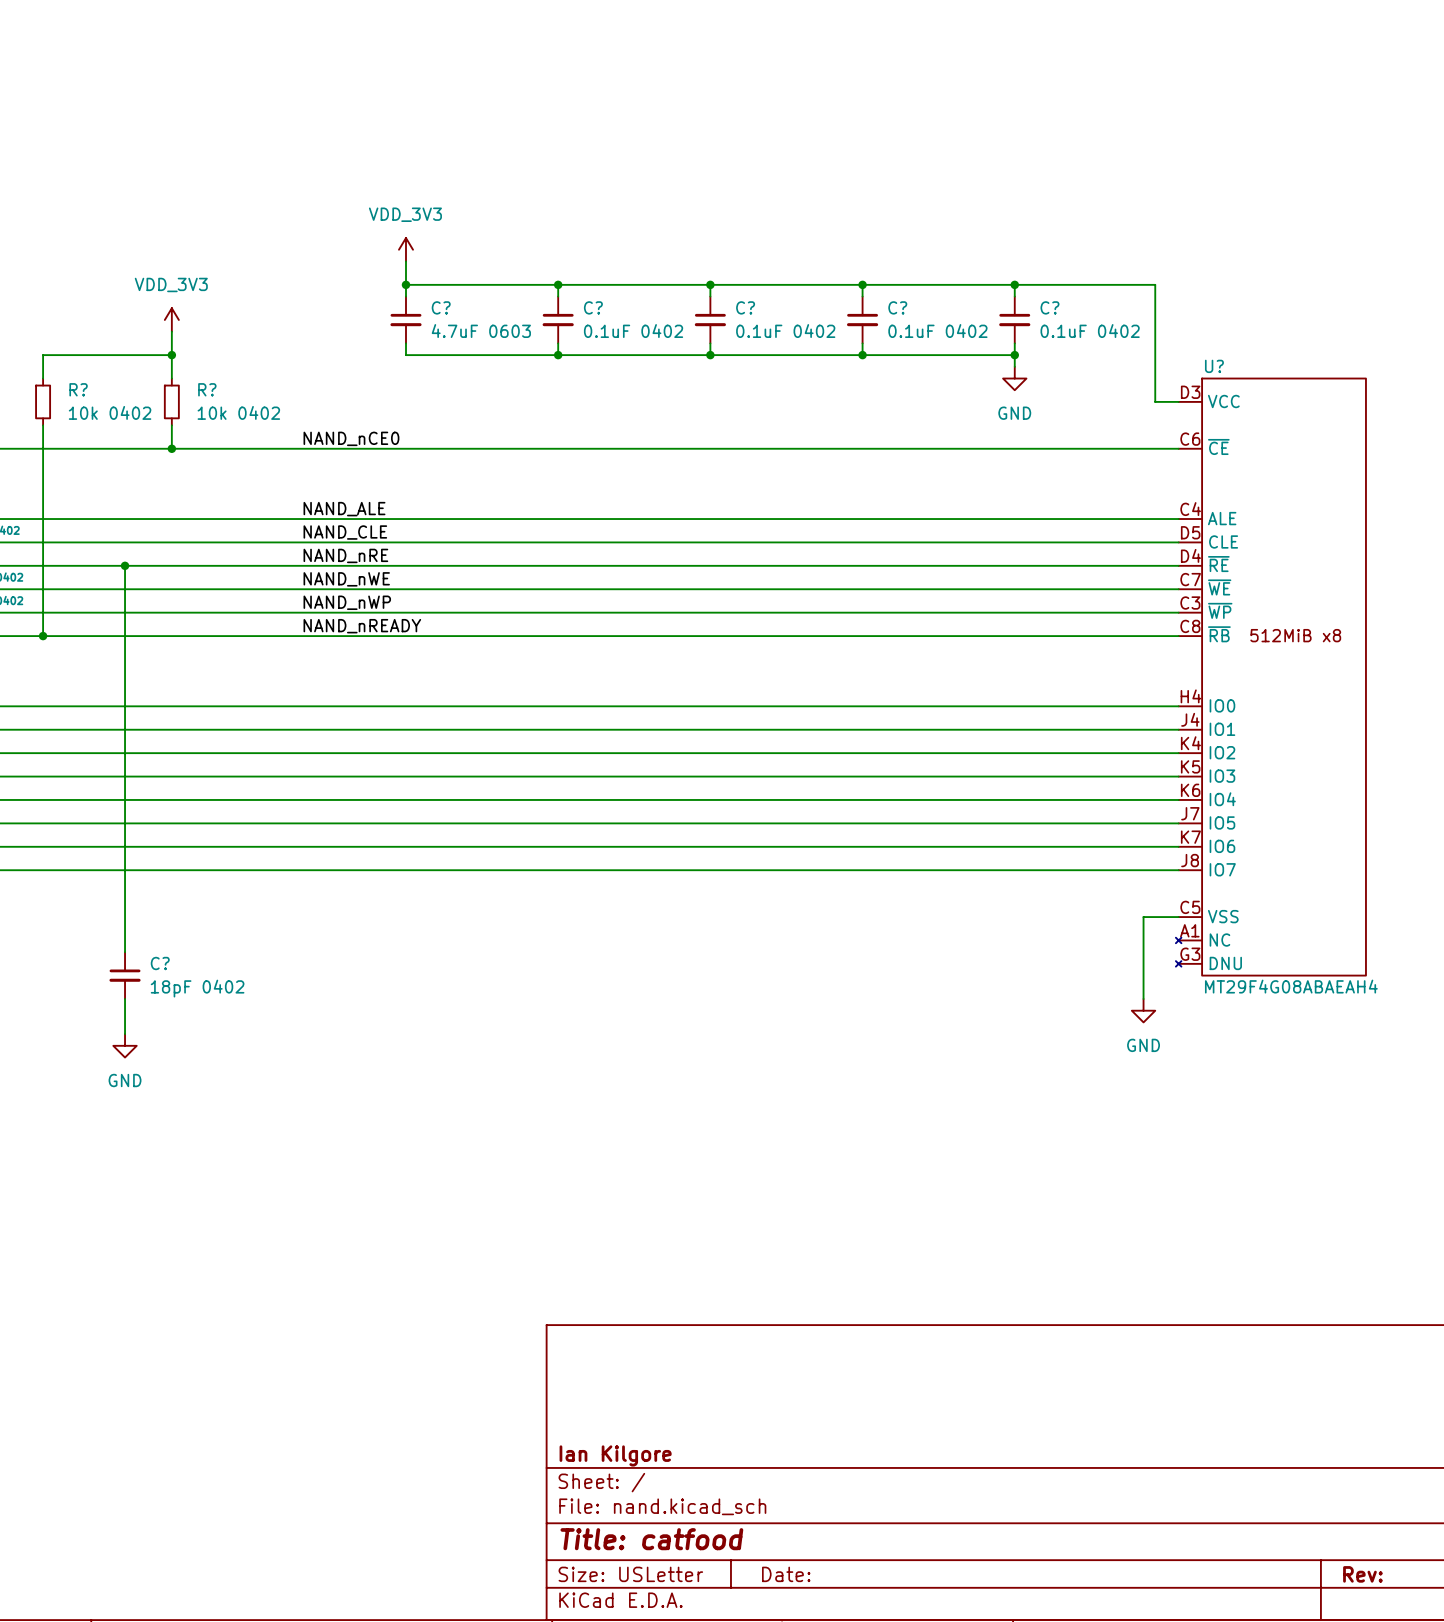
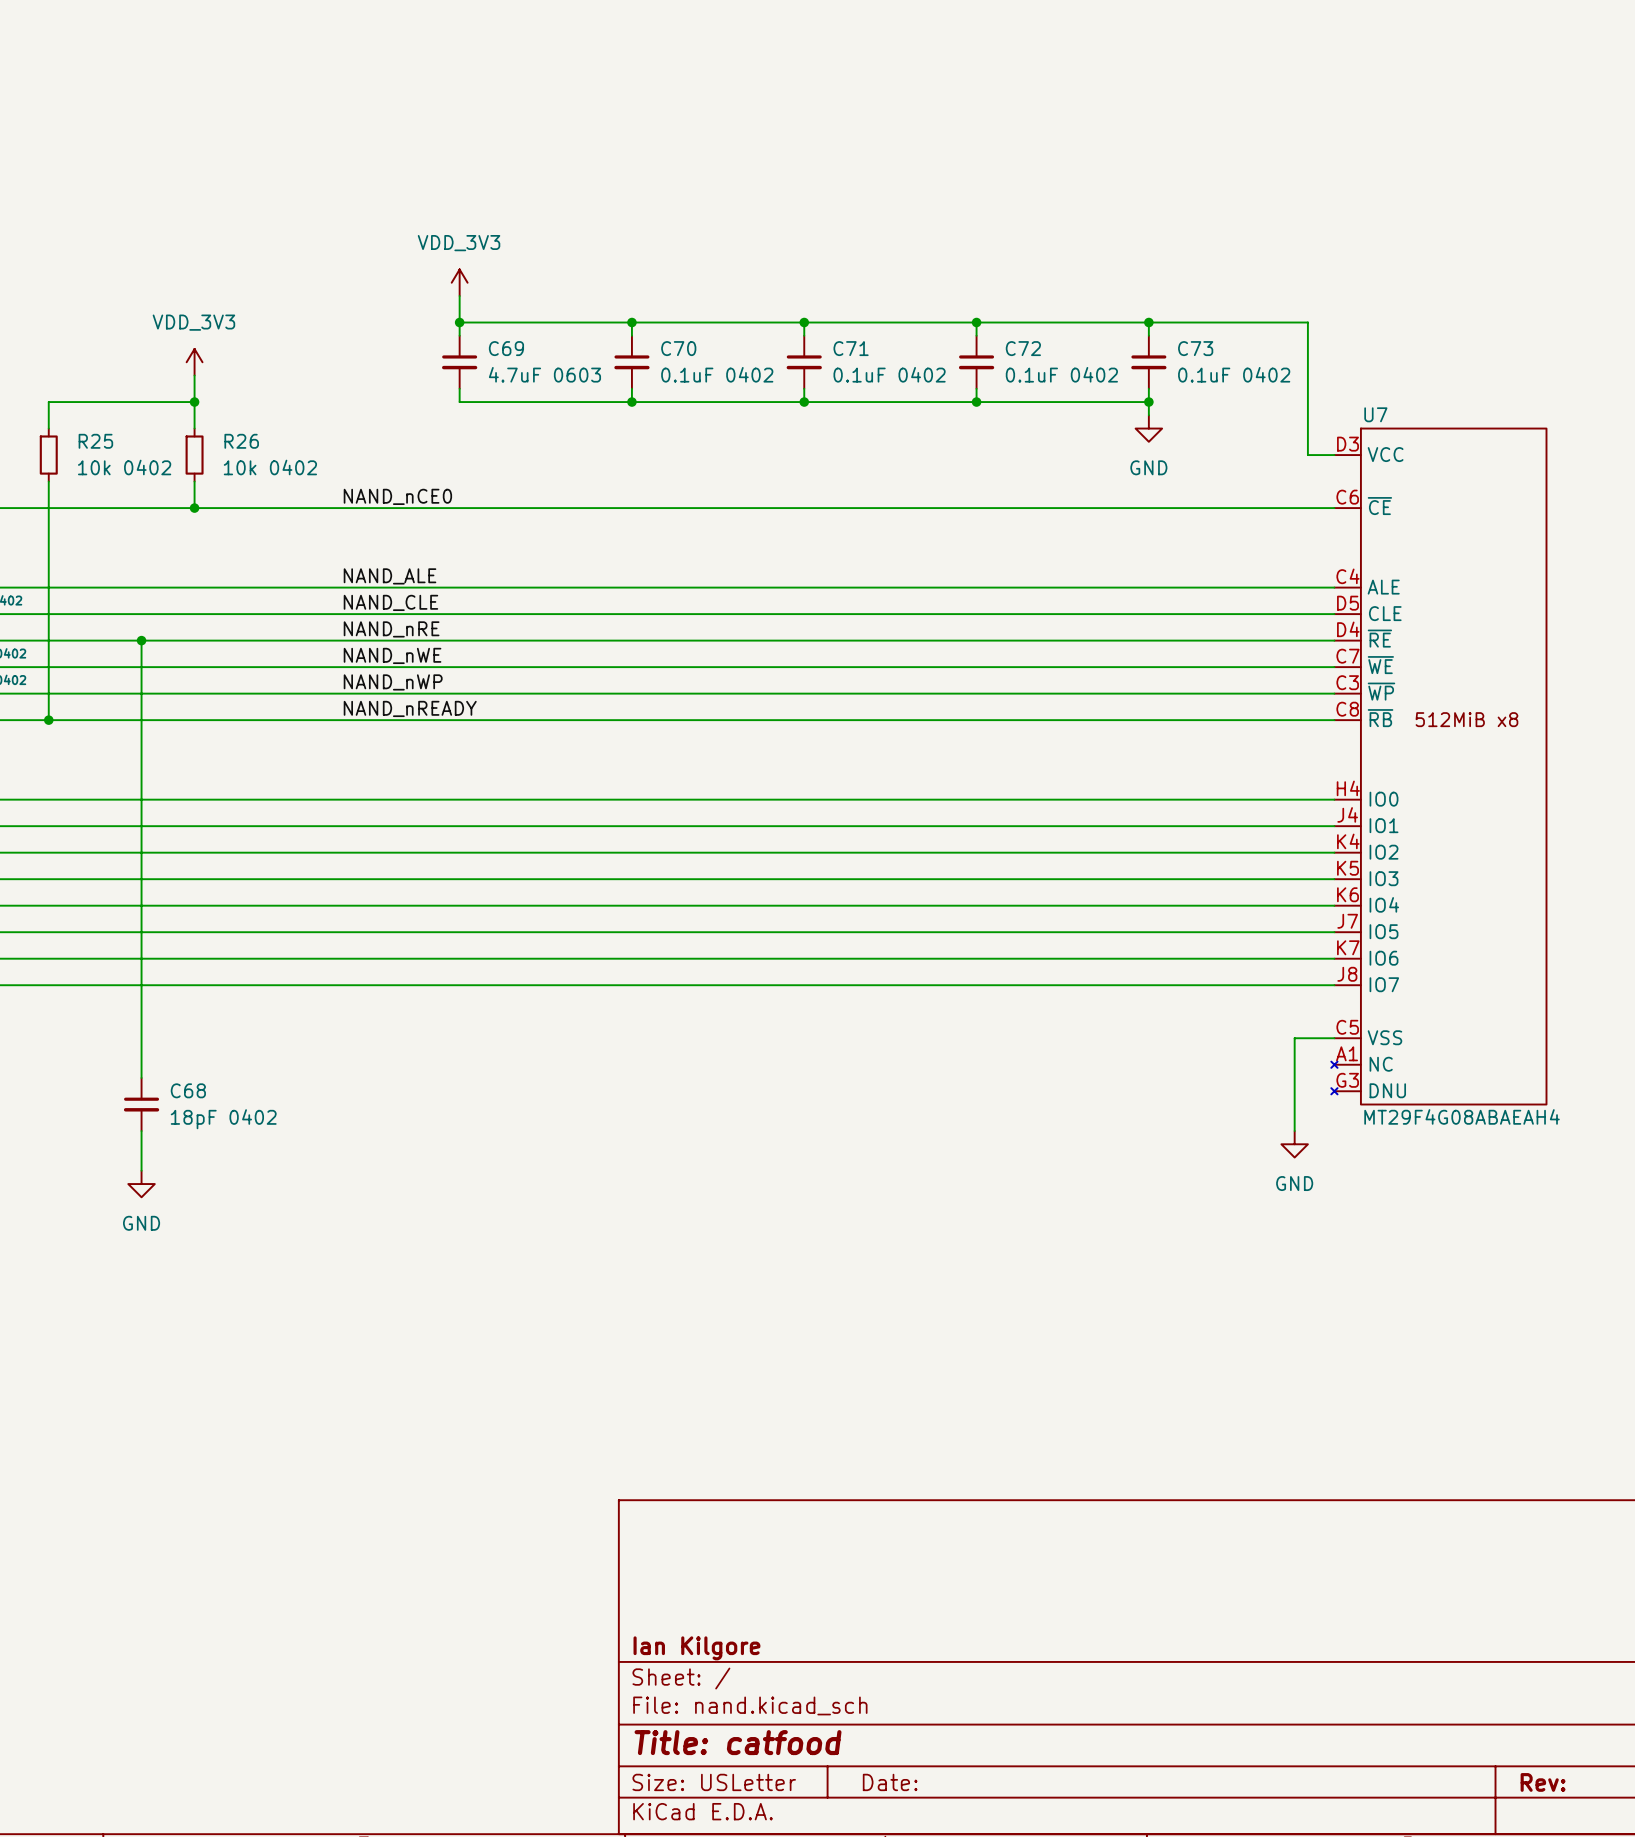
C? name: C? (441, 307) -> C69 (506, 348)
C? name: C? (593, 307) -> C70 (678, 348)
C? name: C? (745, 307) -> C71 (851, 348)
C? name: C? (897, 307) -> C72 (1023, 348)
C? name: C? (1049, 307) -> C73 (1195, 348)
U? name: U? (1214, 366) -> U7 (1375, 414)
R? name: R? (78, 389) -> R25 (95, 441)
R? name: R? (207, 389) -> R26 (241, 441)
C? name: C? (160, 963) -> C68 (188, 1090)

